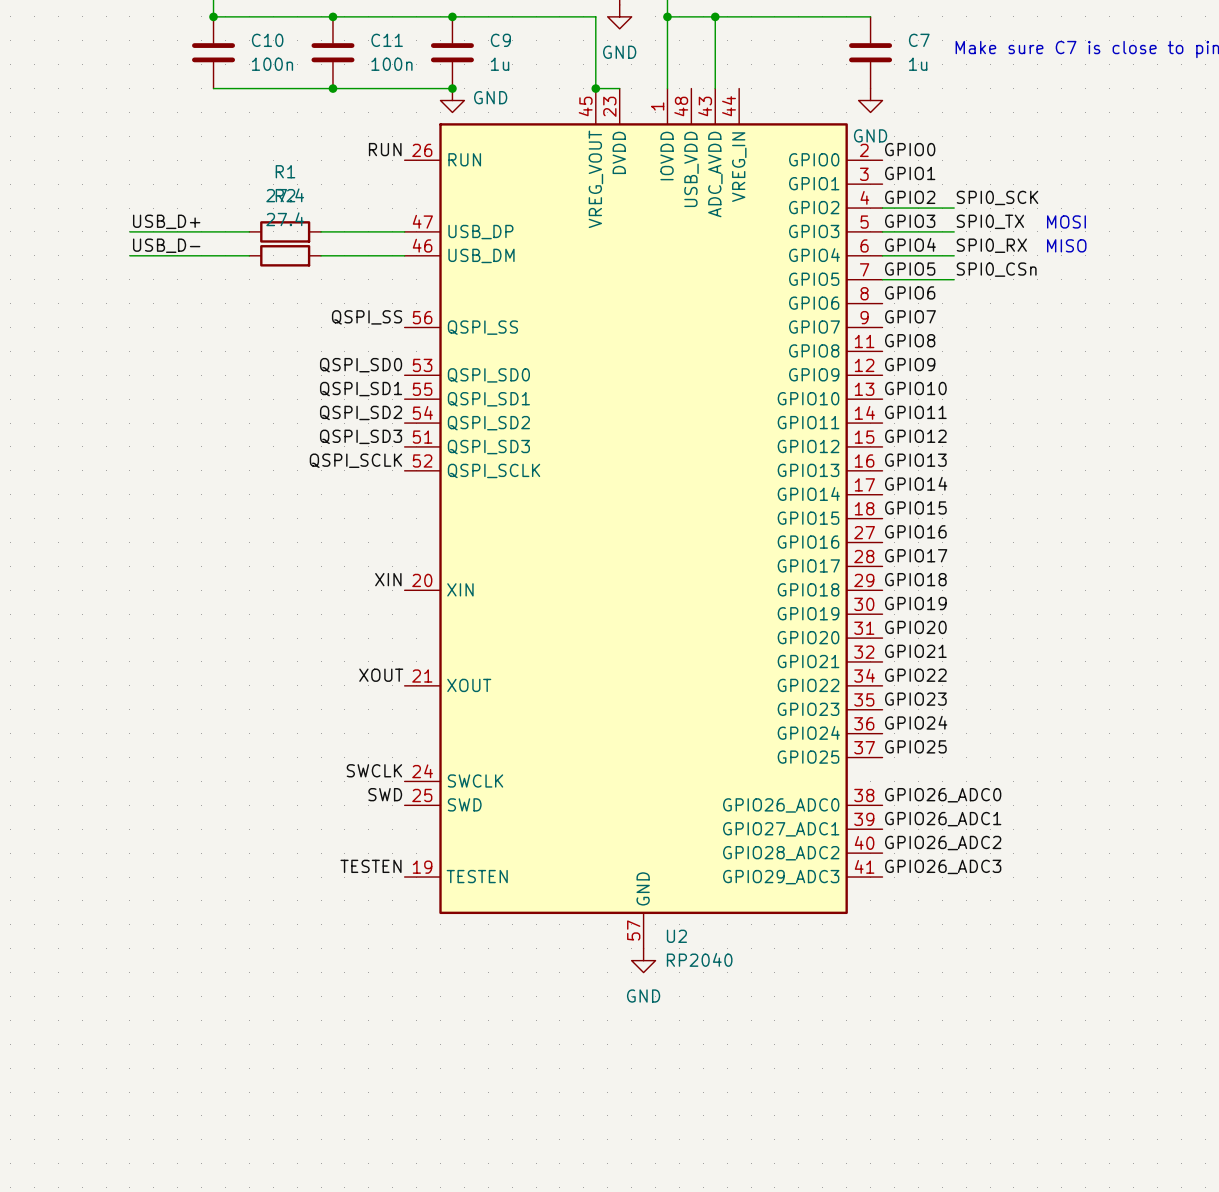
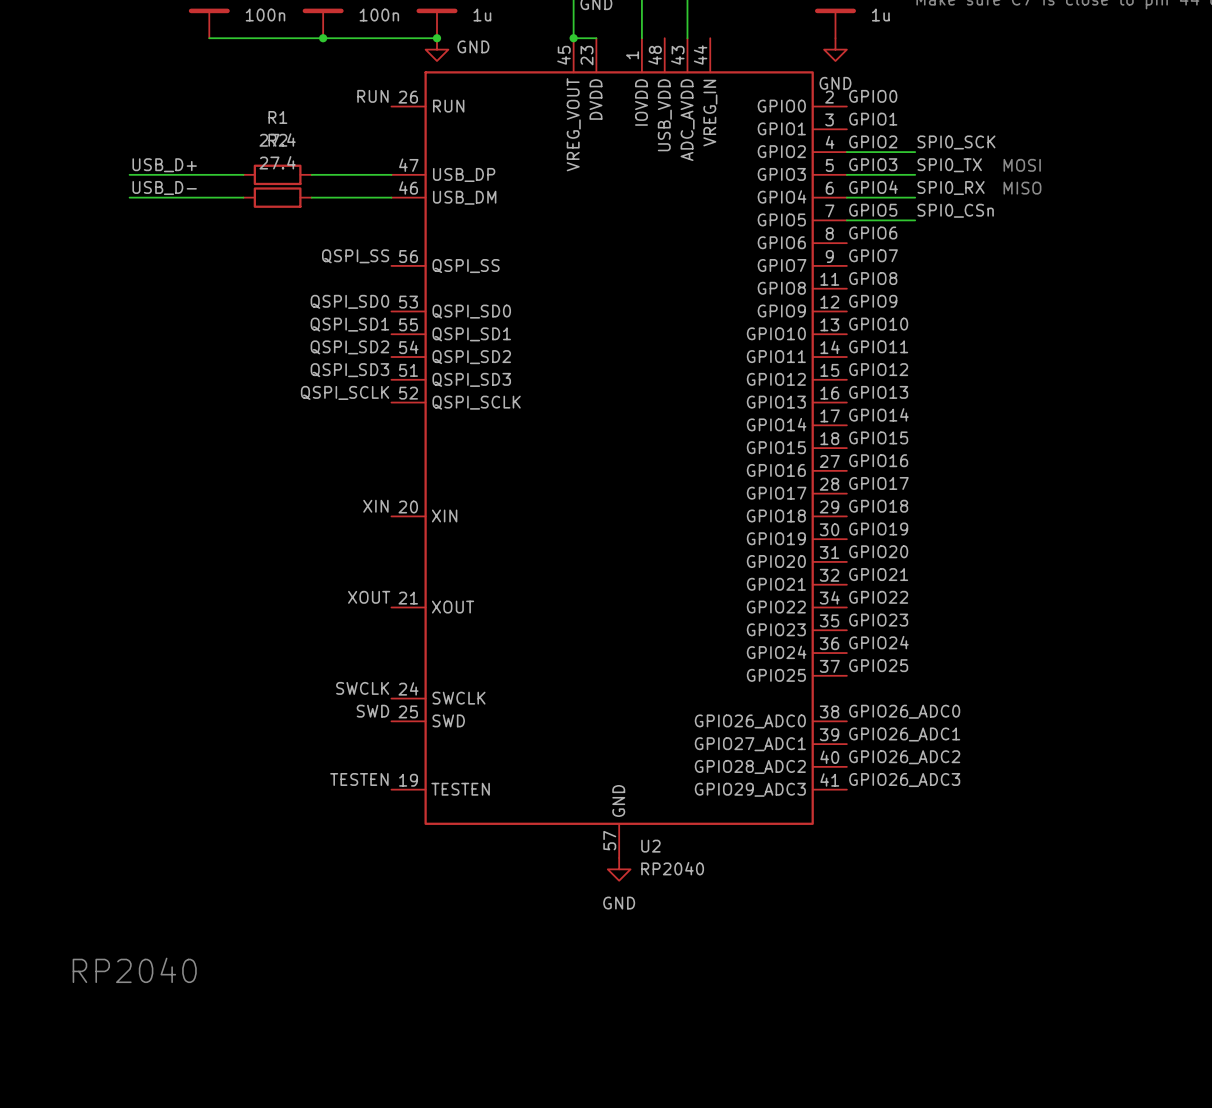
text: none -> RP2040 (134, 970)

